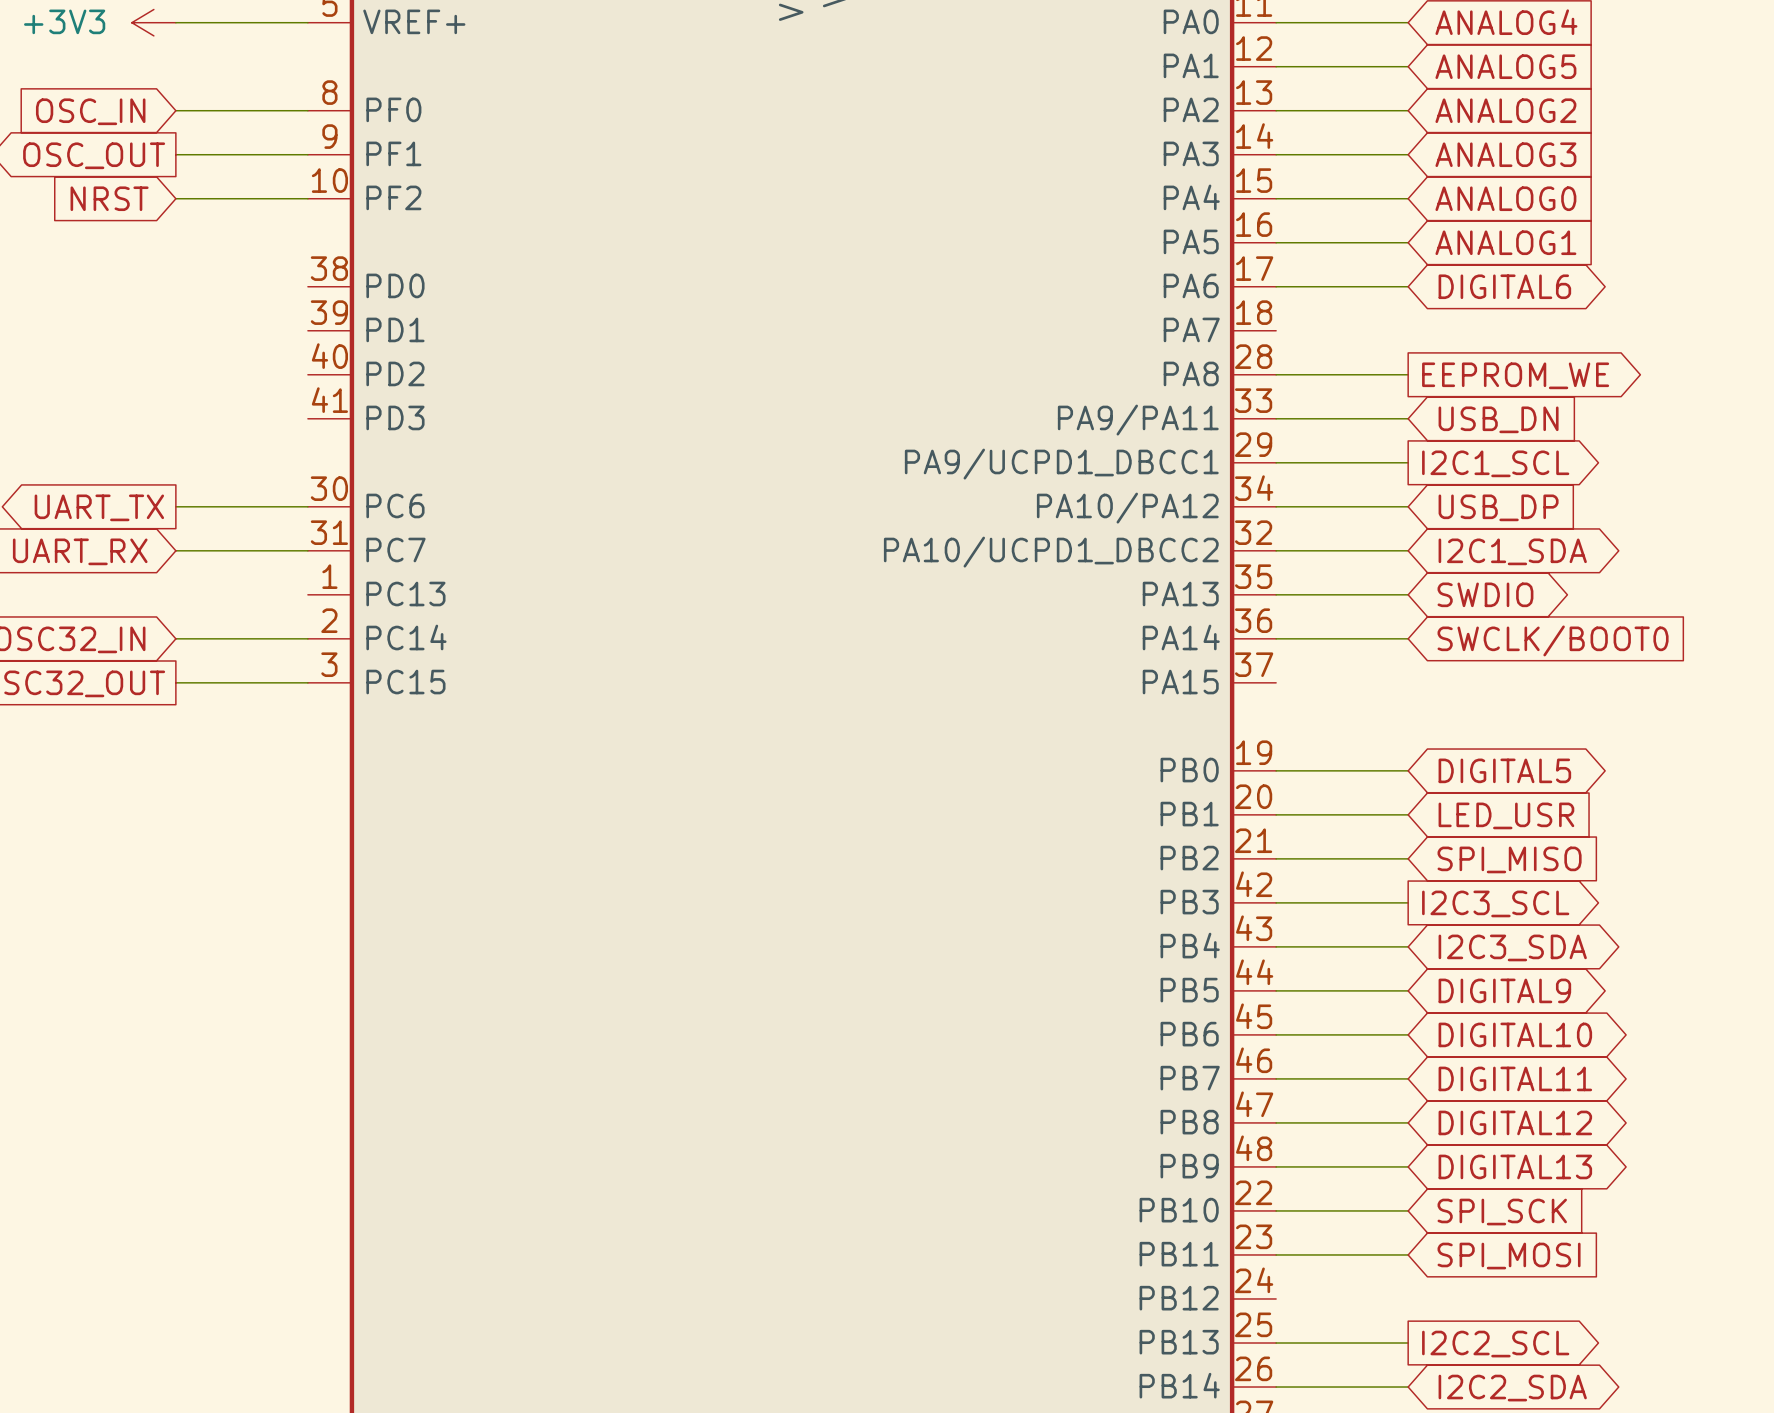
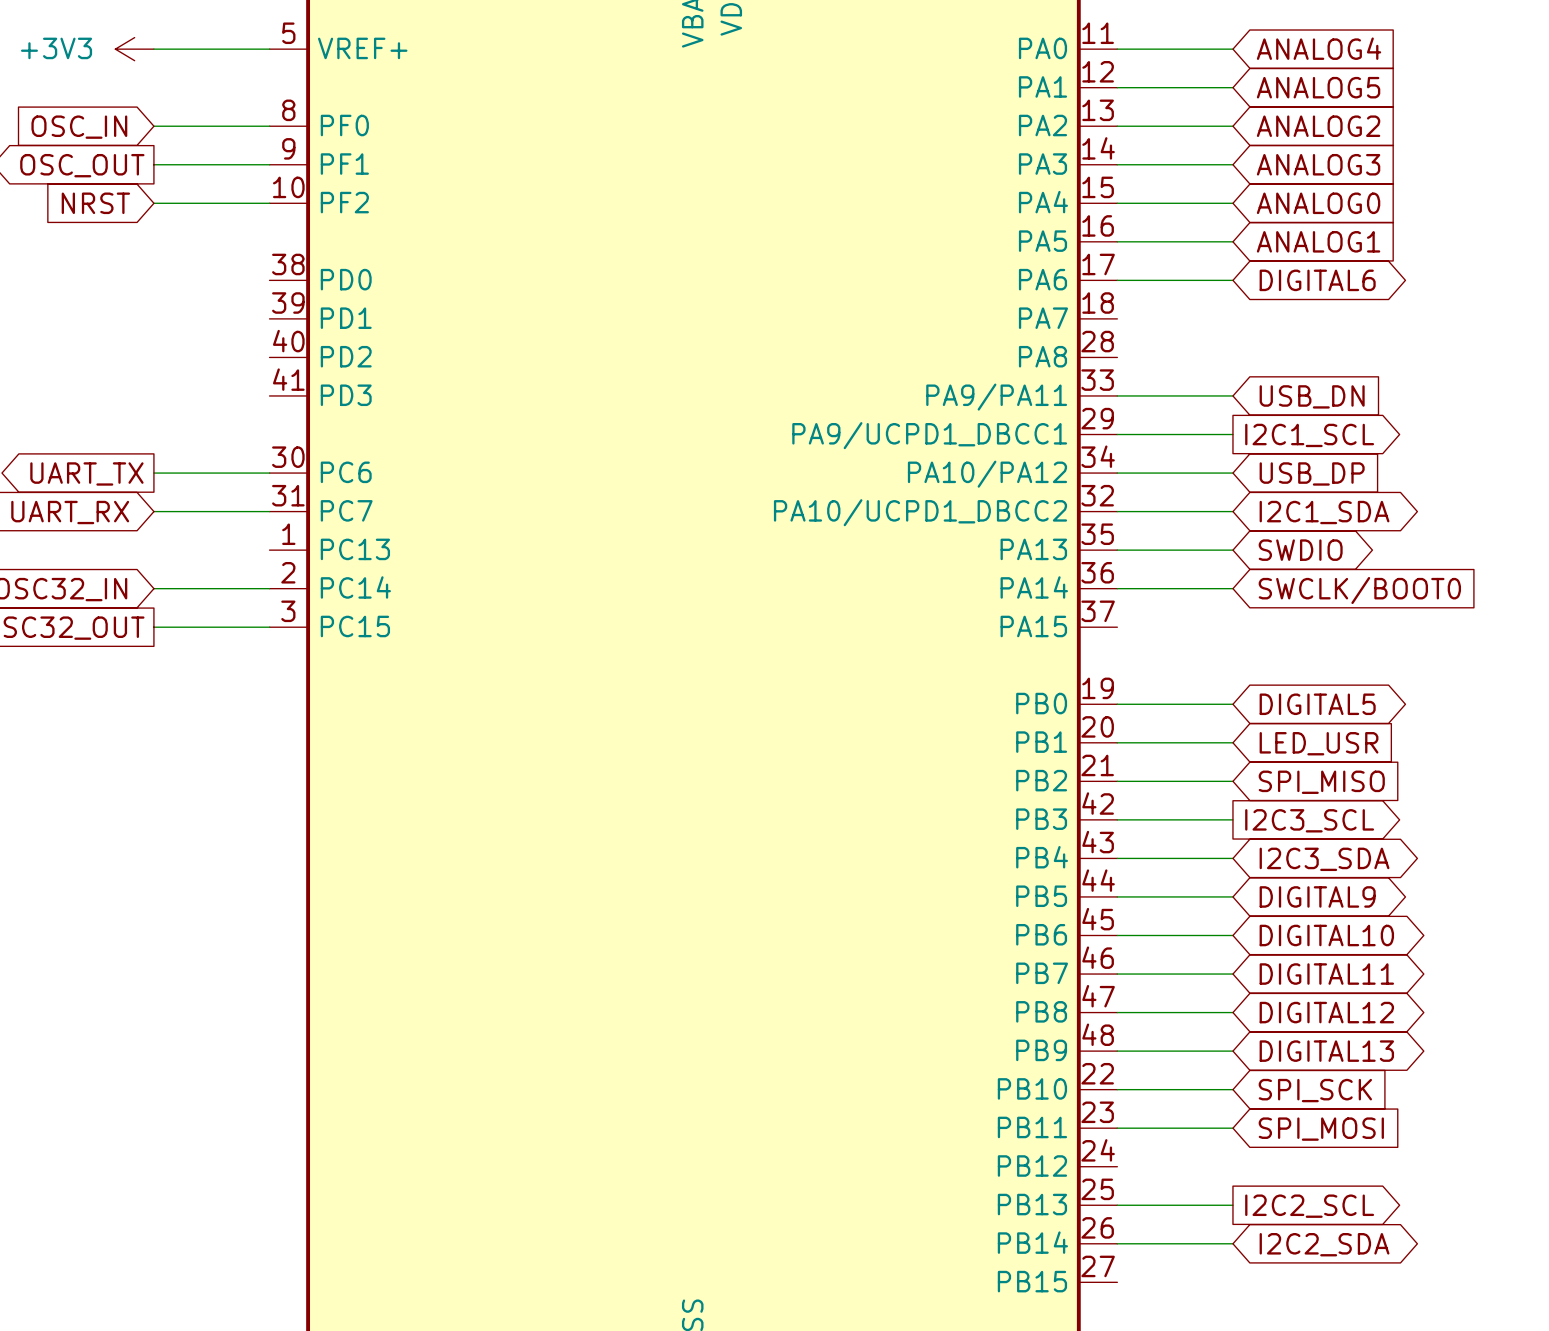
wire: (1276, 374) (1408, 374) -> none
global label: EEPROM_WE (1515, 375) -> none

